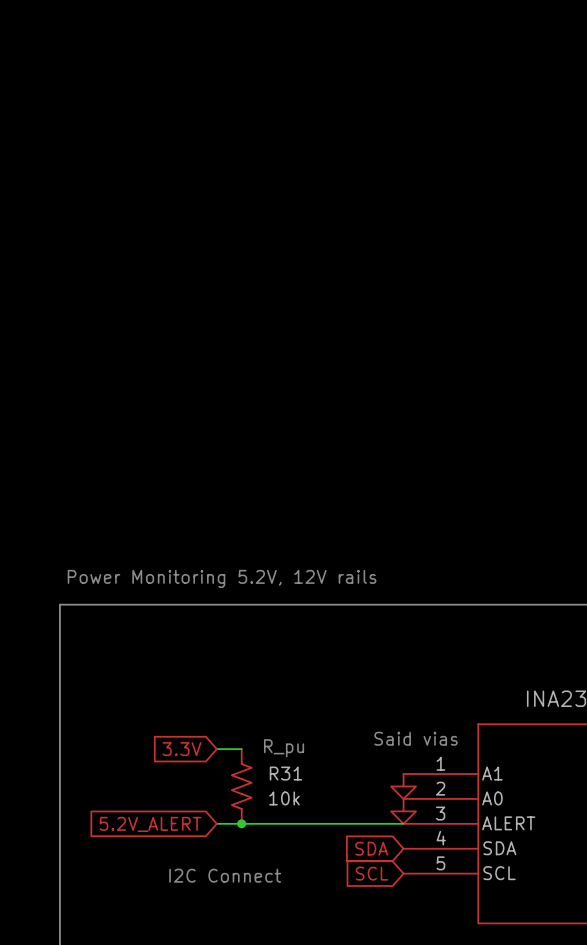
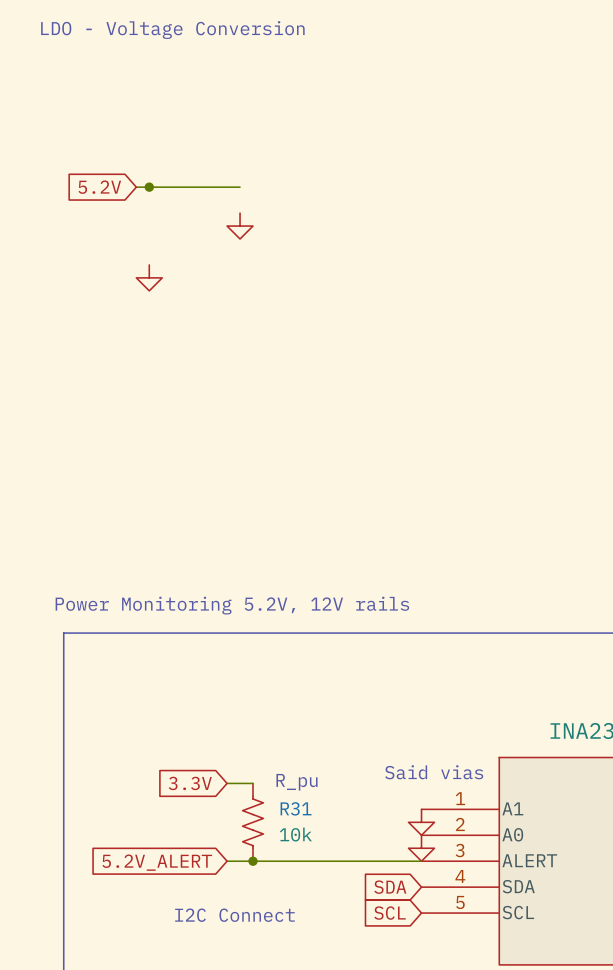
text: none -> LDO - Voltage Conversion (172, 30)
global label: none -> 5.2V (99, 187)
wire: none -> (136, 187) (240, 187)
junction: none -> (149, 187)
power symbol: none -> (240, 226)
power symbol: none -> (149, 277)

